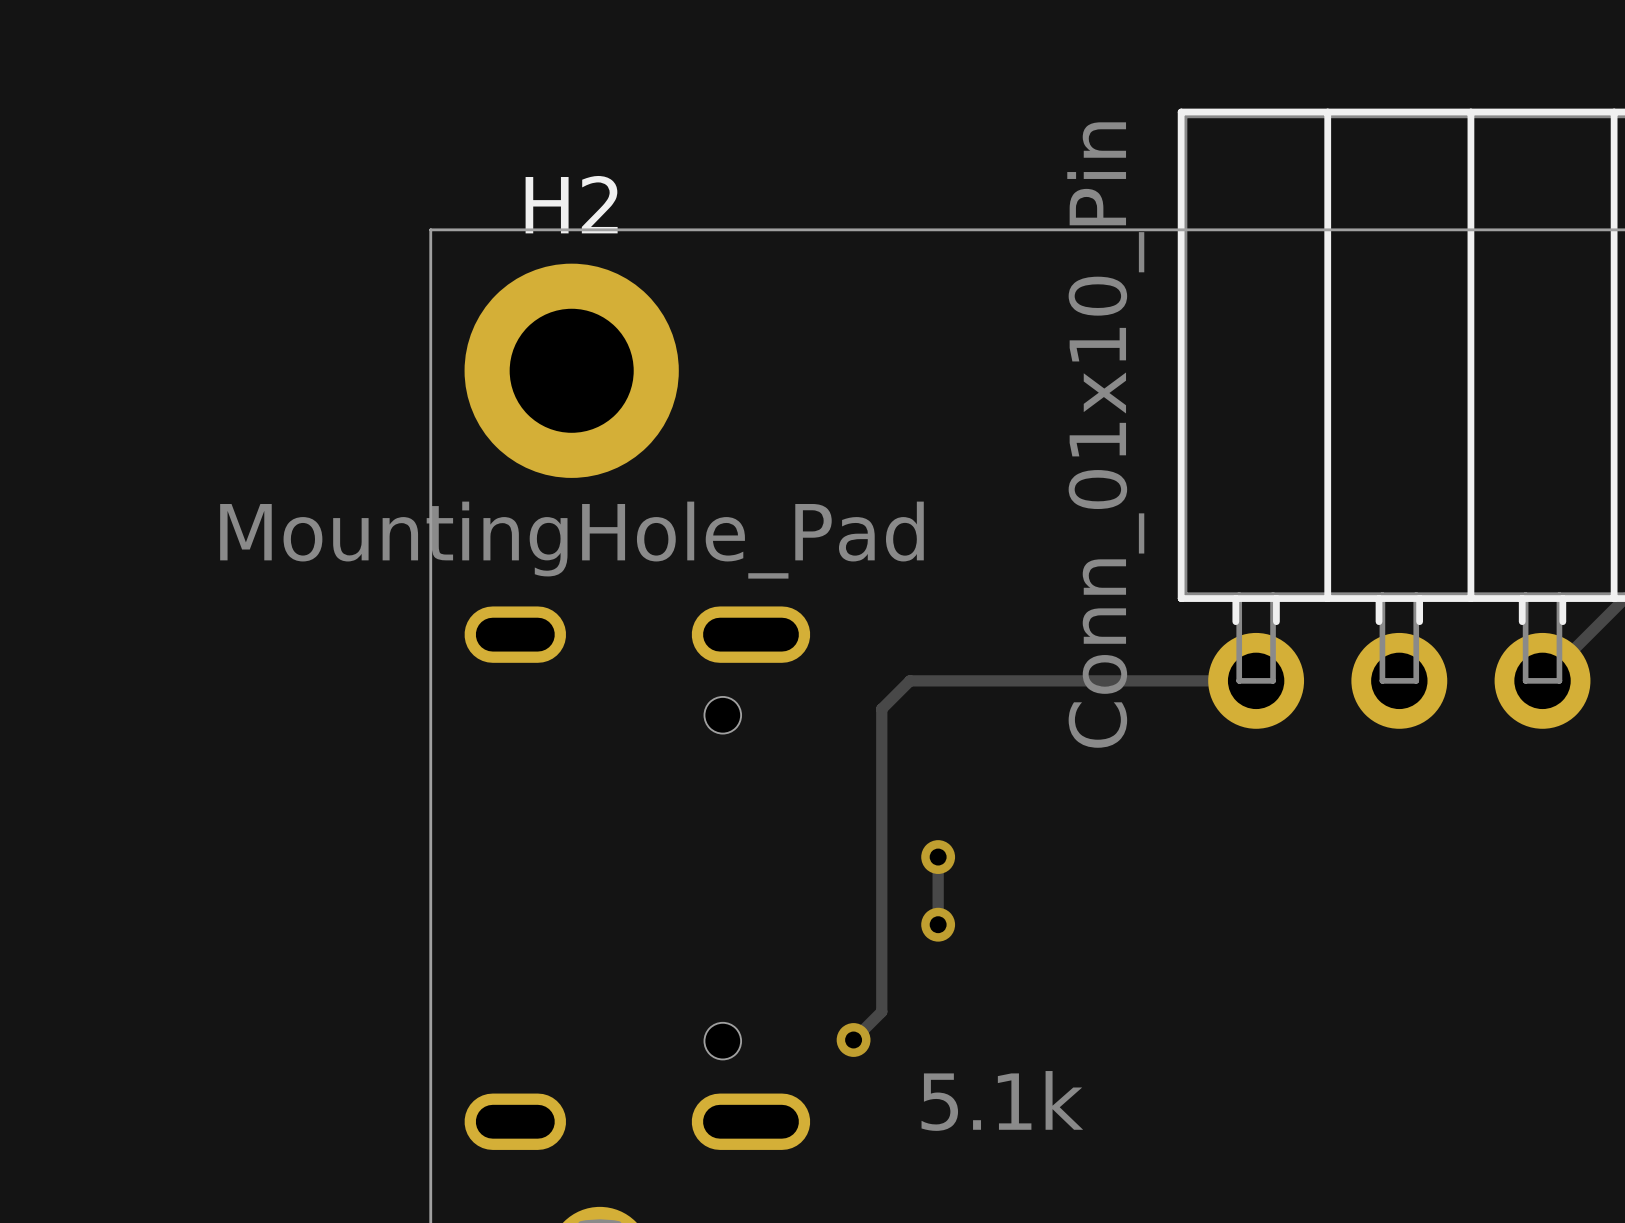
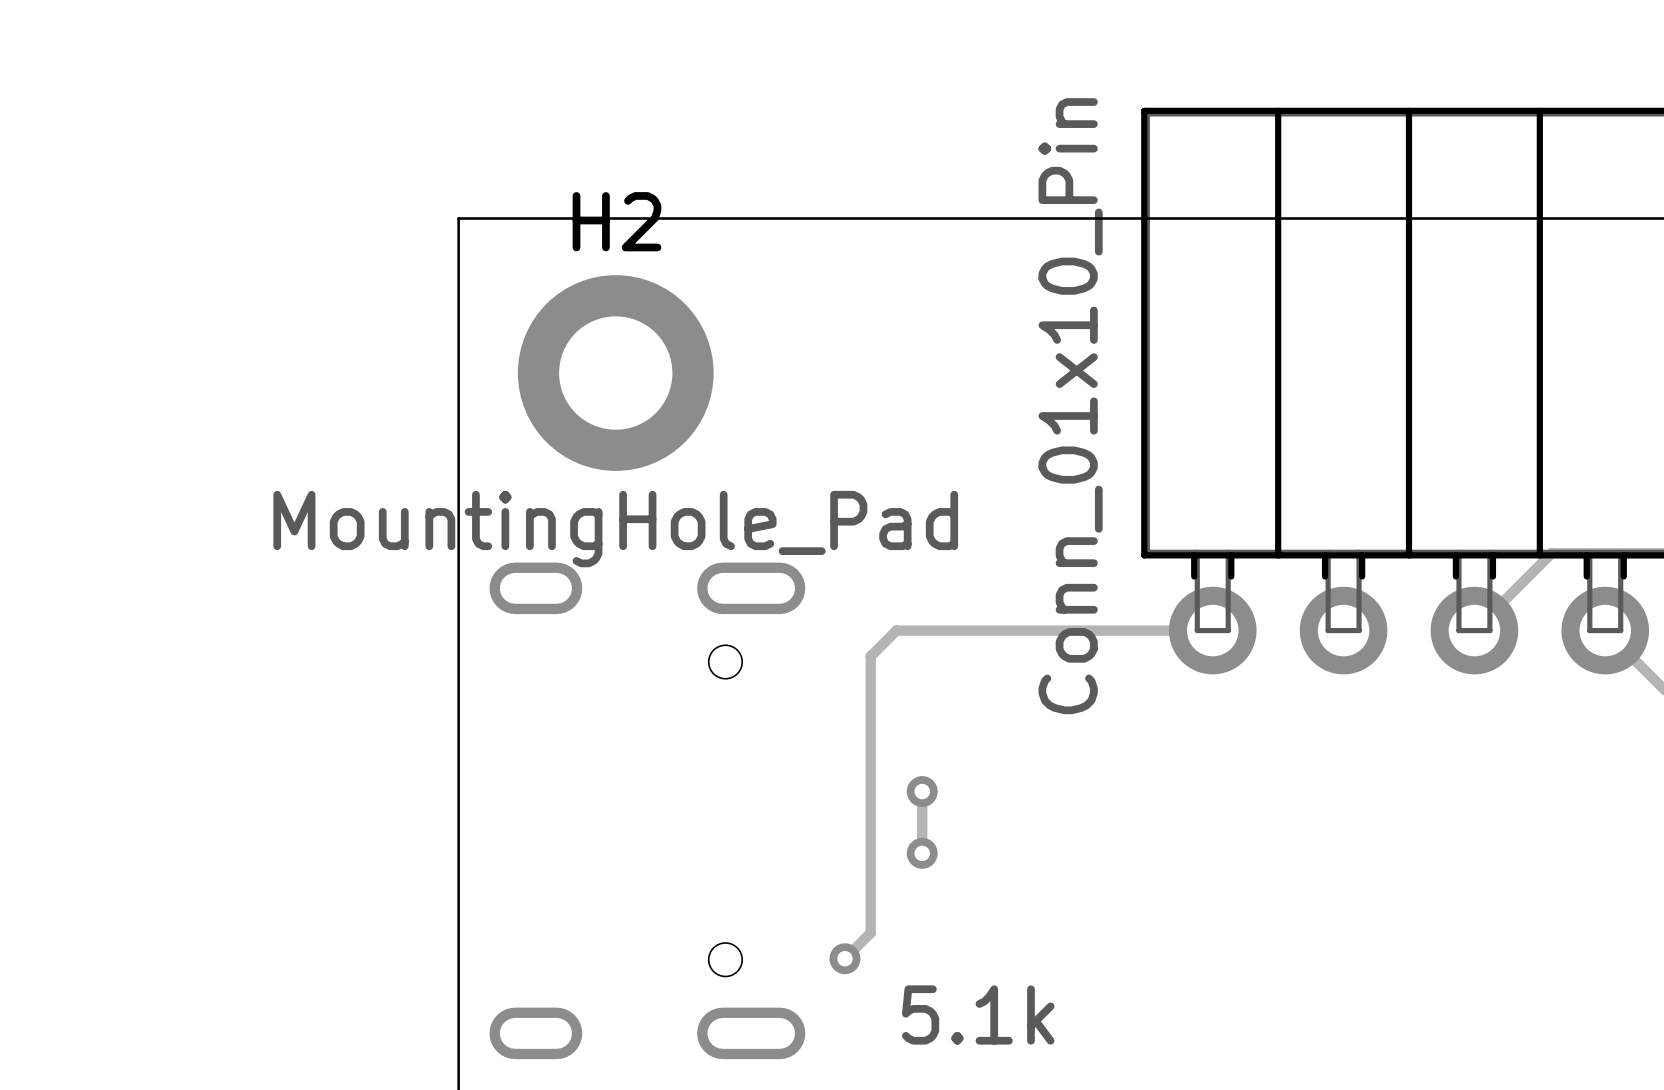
H2 position: (571, 370) -> (615, 373)

